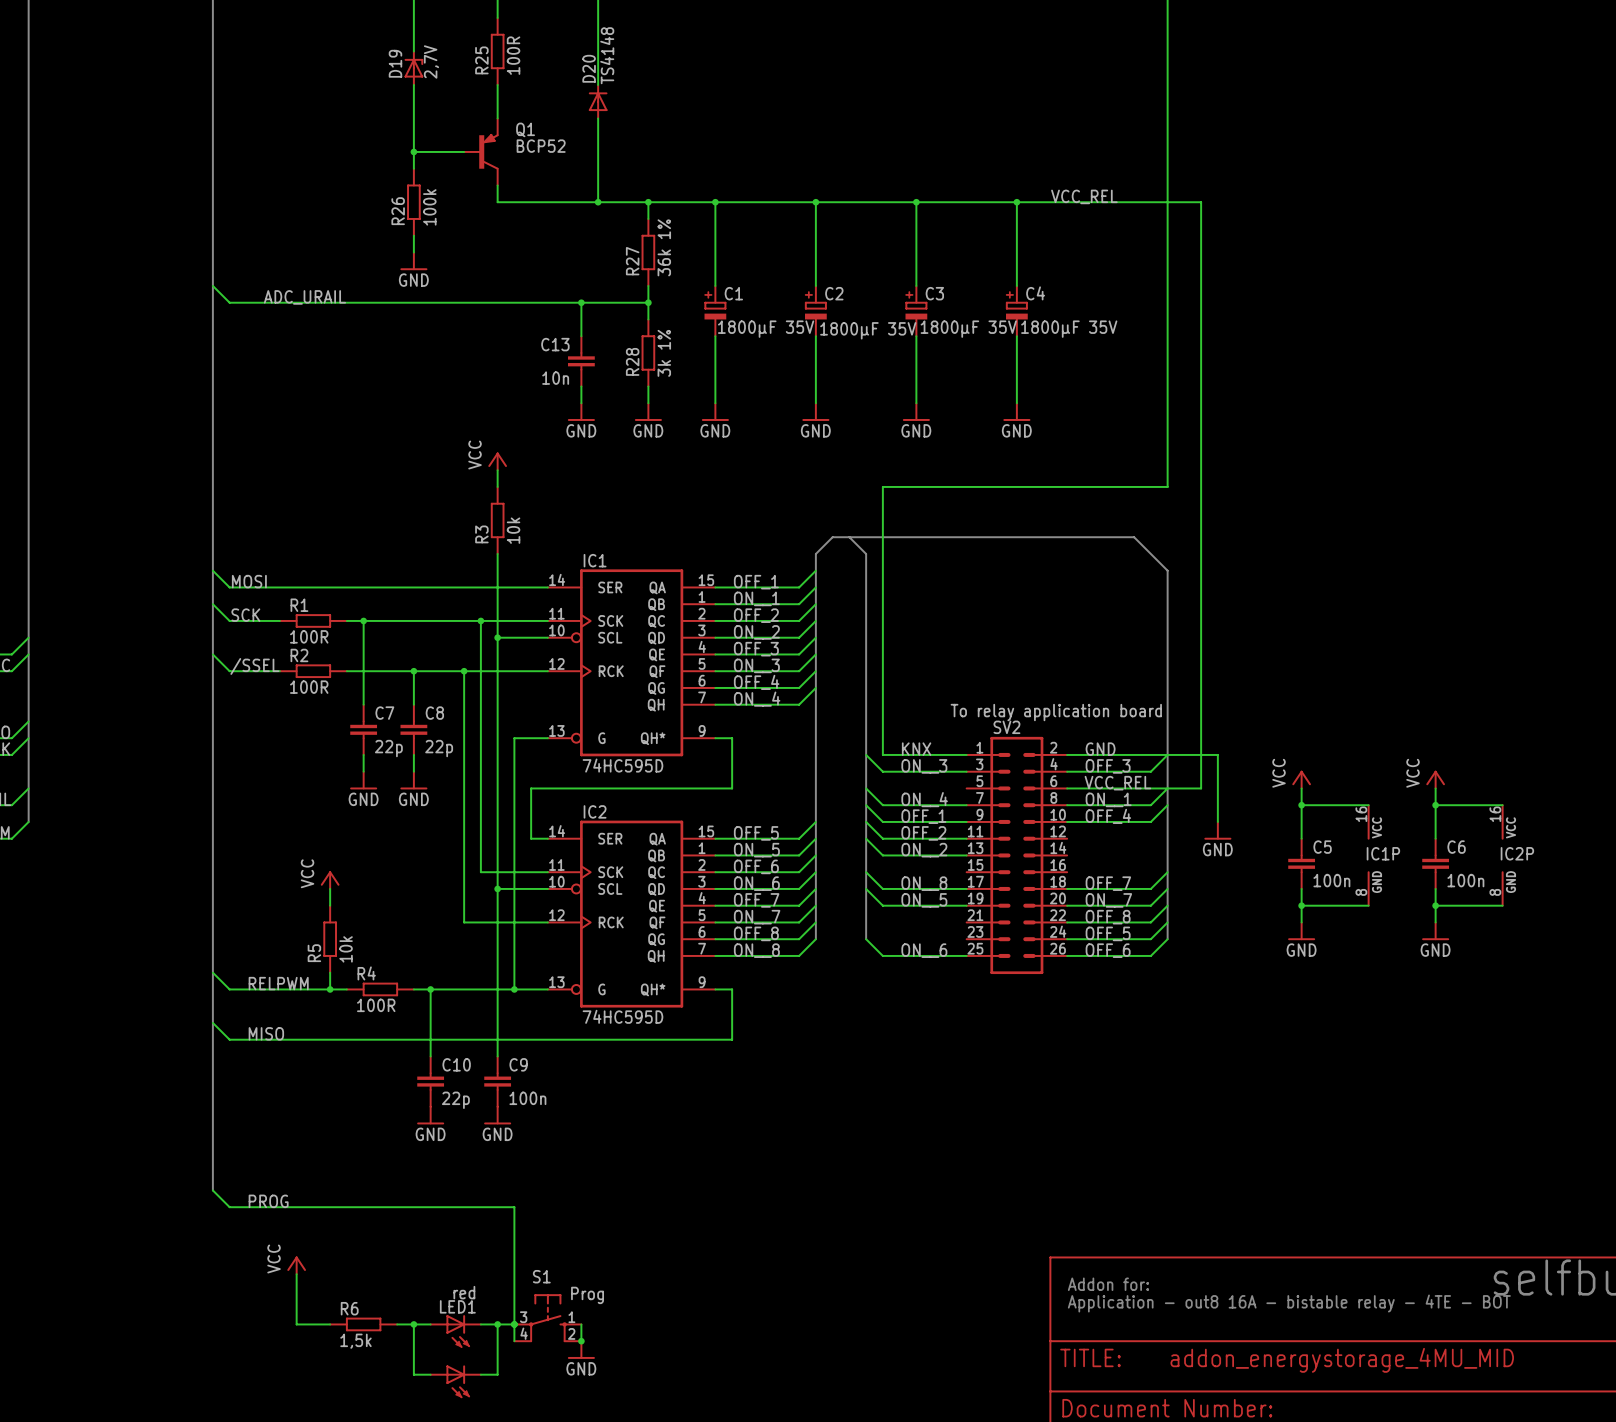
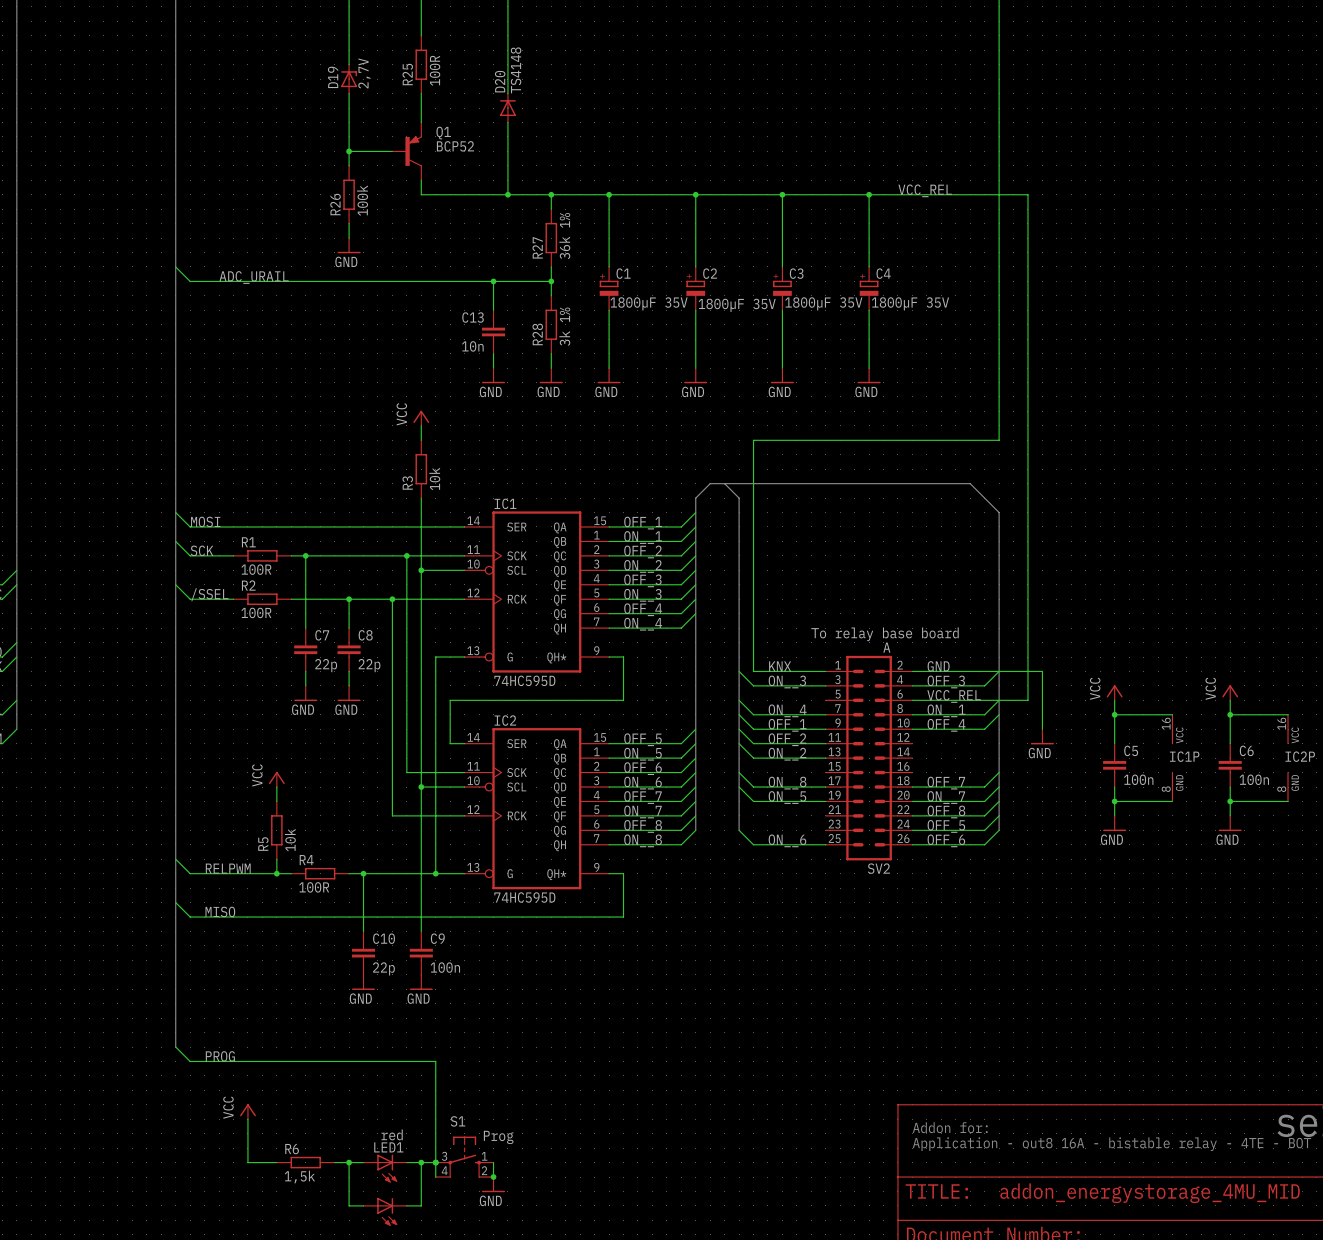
text: To relay application board (1056, 712) -> To relay base board (885, 634)
SV2 name position: SV2 (1006, 727) -> SV2 (878, 868)
SV2 value: none -> A (886, 647)

